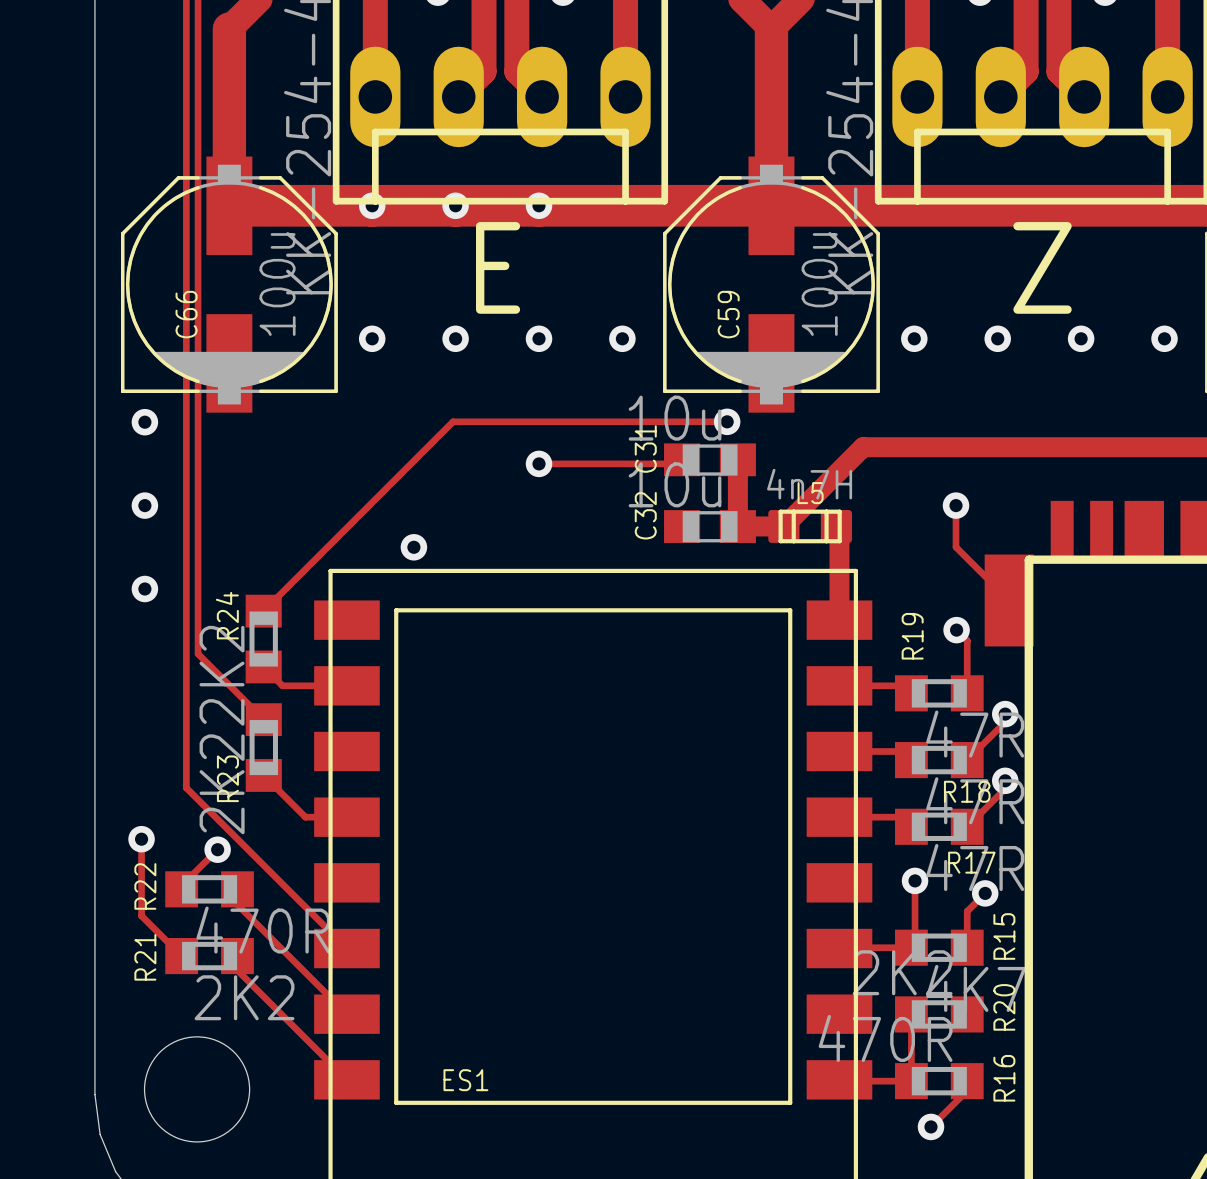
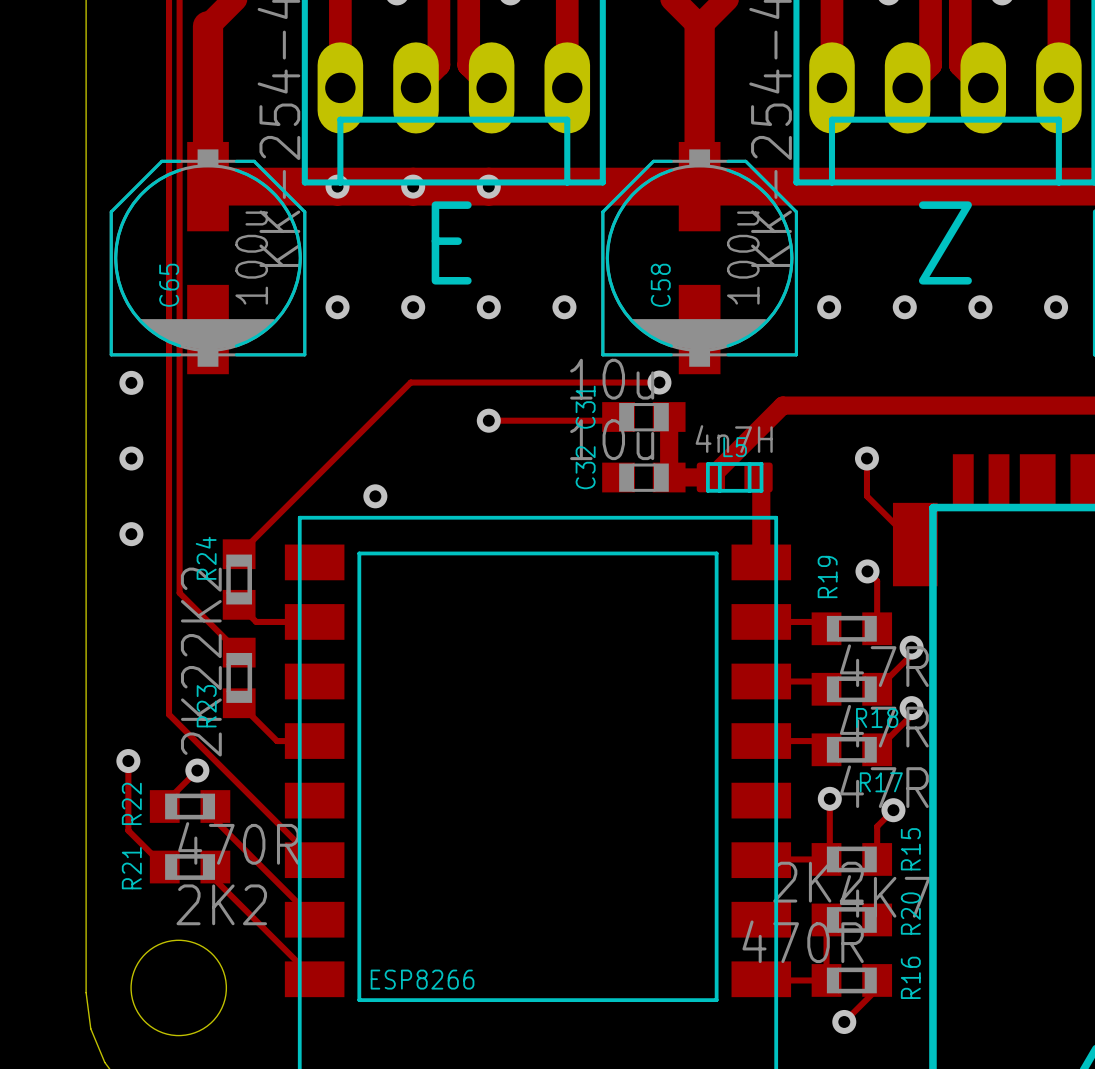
C66 name: C66 (186, 314) -> C65 (169, 285)
C59 name: C59 (728, 314) -> C58 (660, 285)
ES1 name: ES1 (465, 1080) -> ESP8266 (422, 979)

